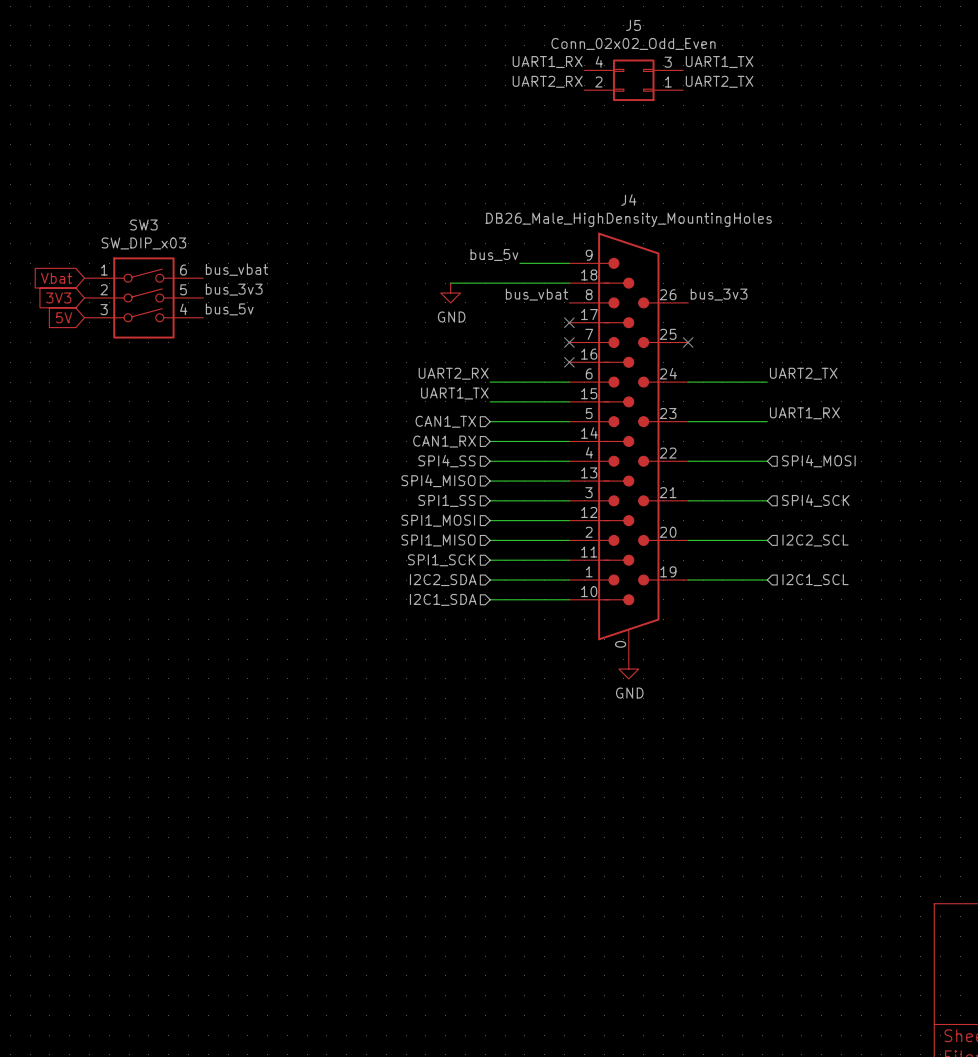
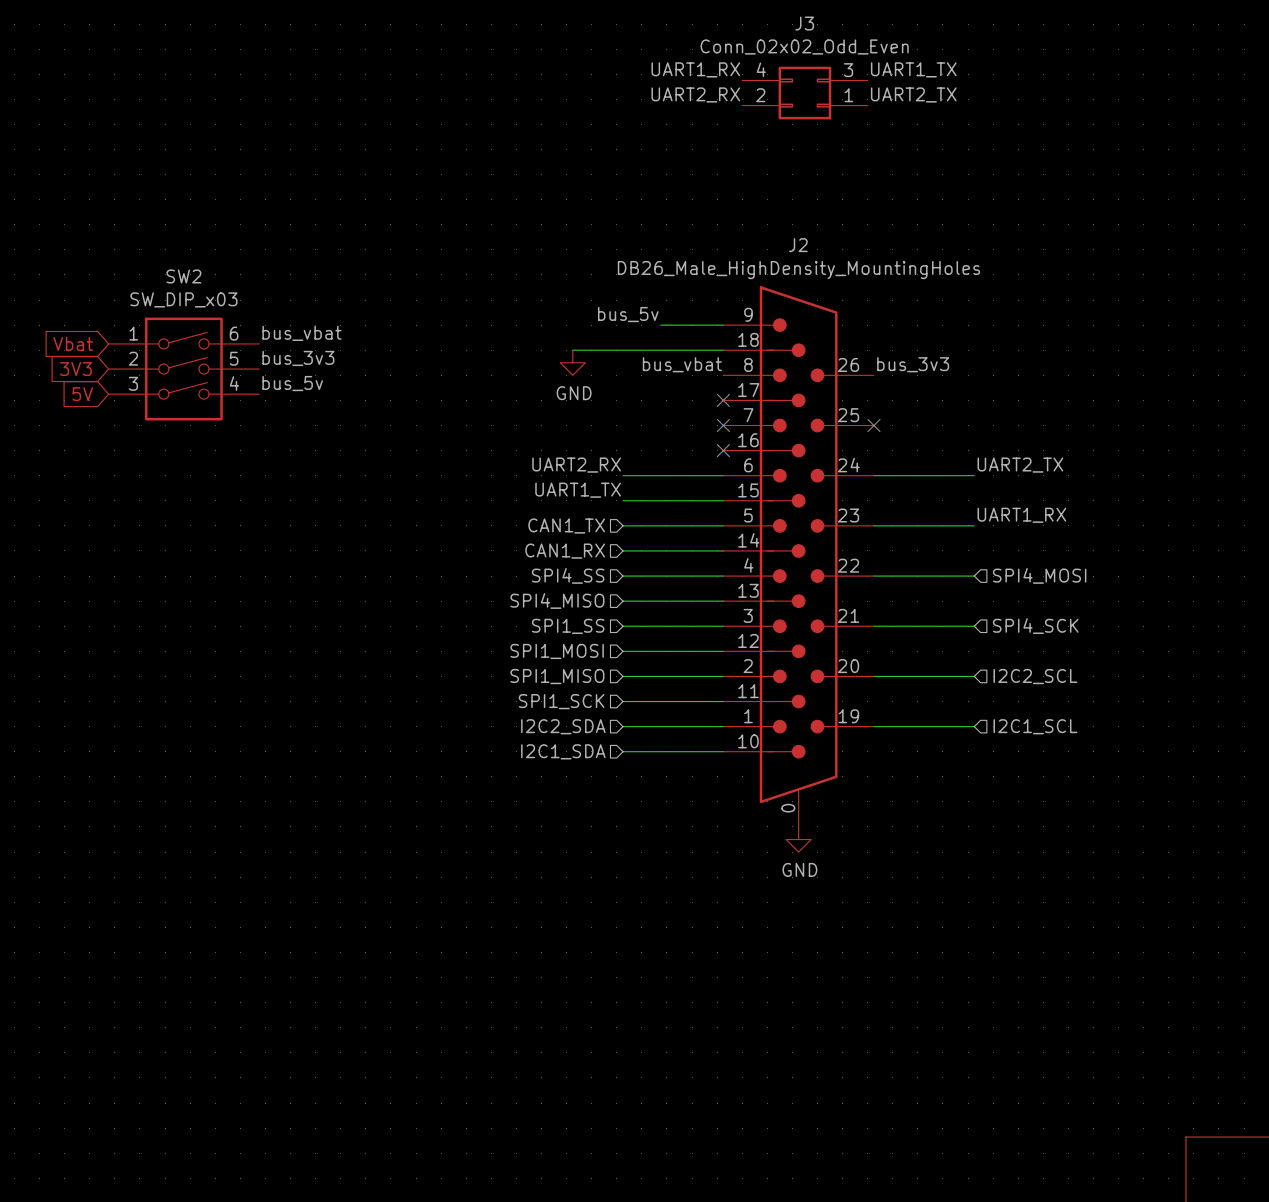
J5 name: J5 (633, 25) -> J3 (804, 23)
J4 name: J4 (628, 200) -> J2 (798, 245)
SW3 name: SW3 (143, 224) -> SW2 (183, 276)

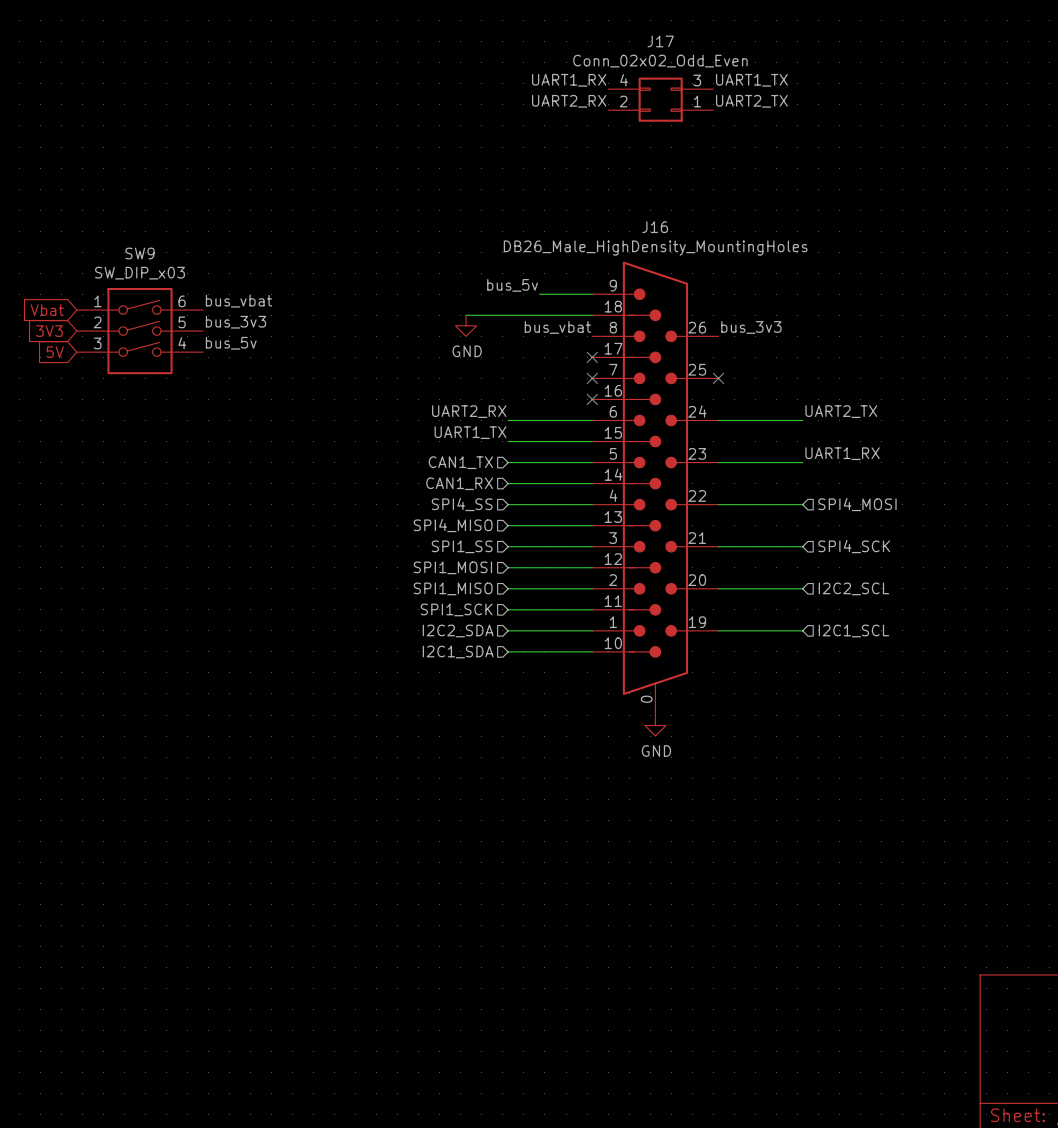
J3 name: J3 (804, 23) -> J17 (660, 41)
J2 name: J2 (798, 245) -> J16 (655, 227)
SW2 name: SW2 (183, 276) -> SW9 (140, 253)

